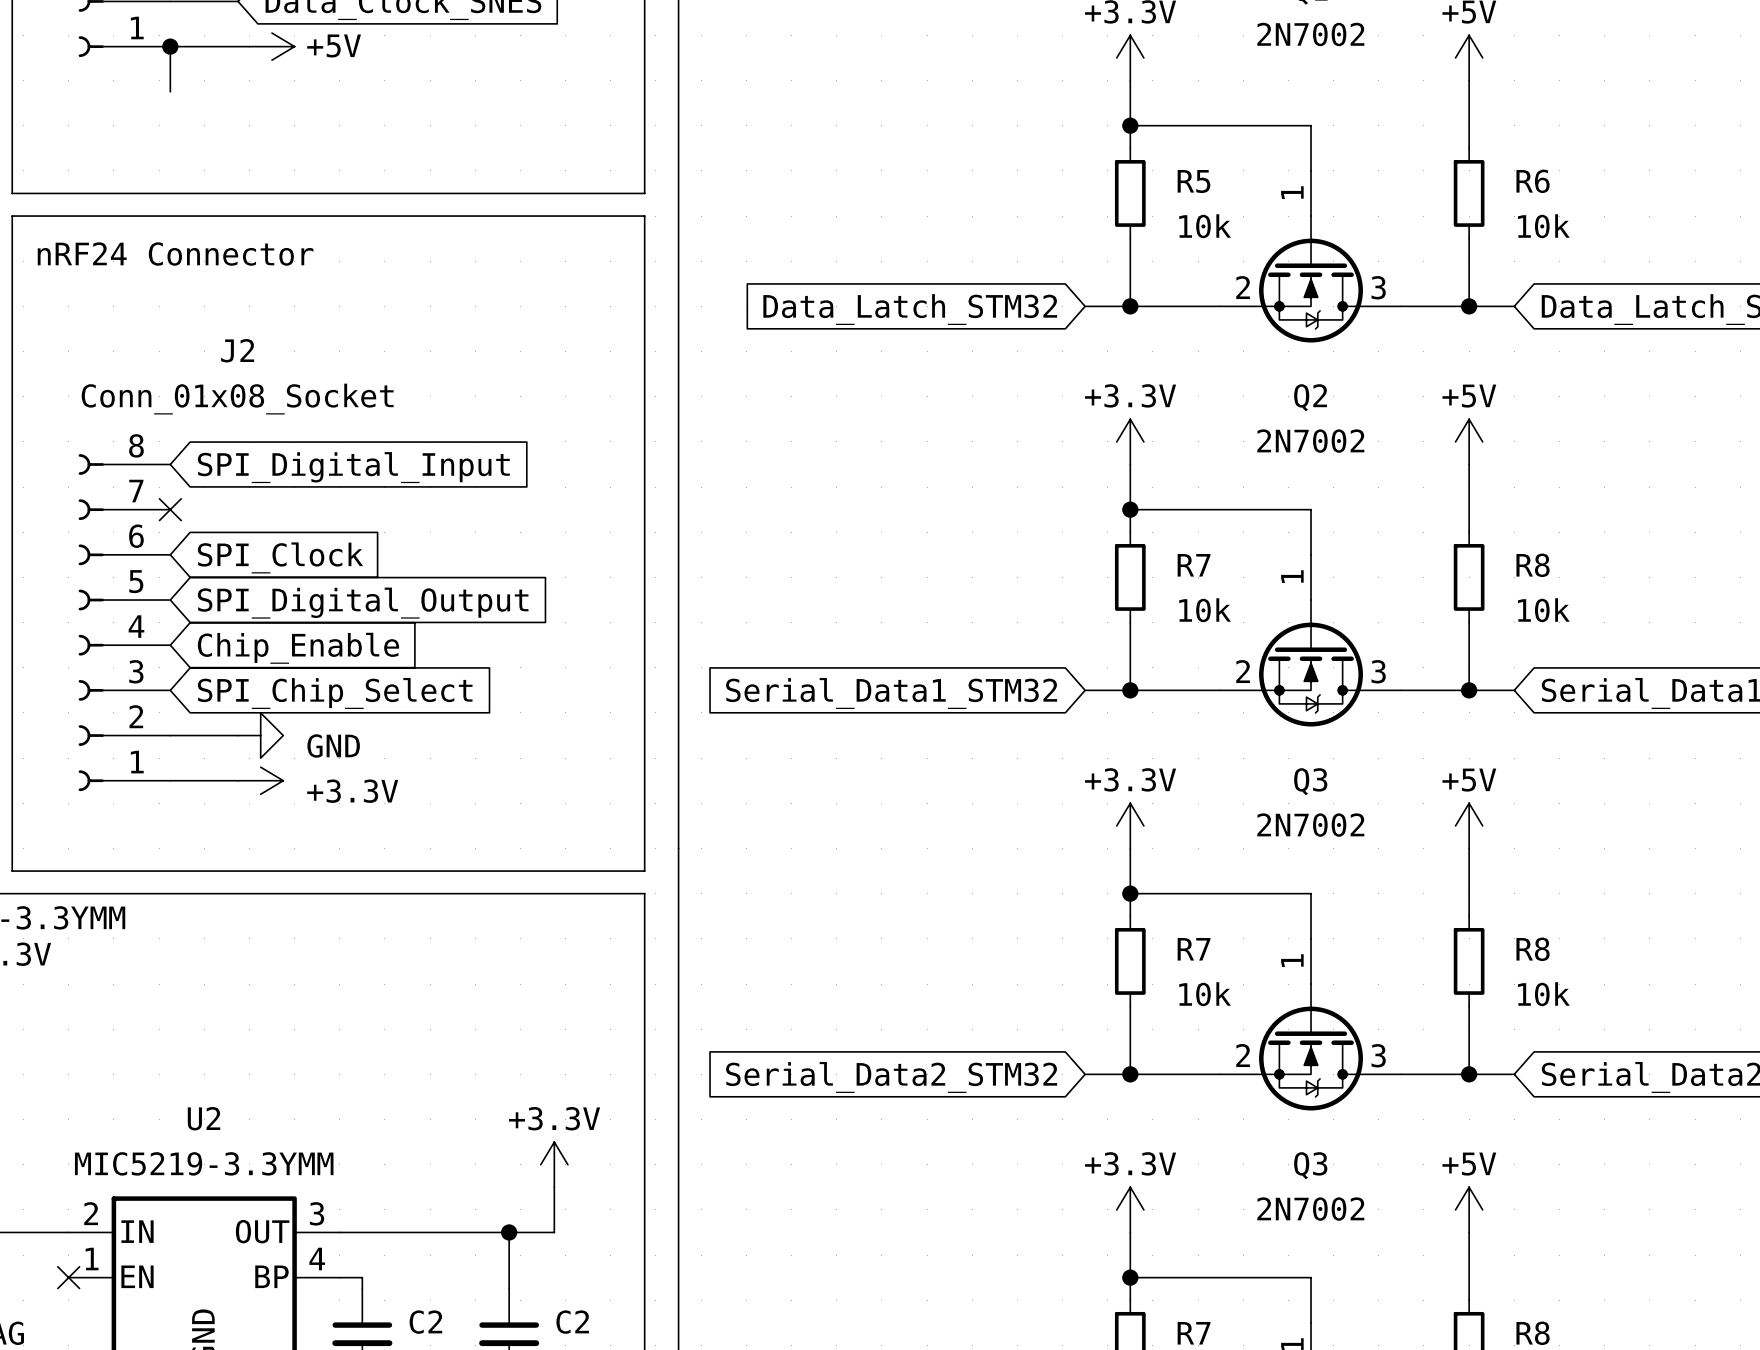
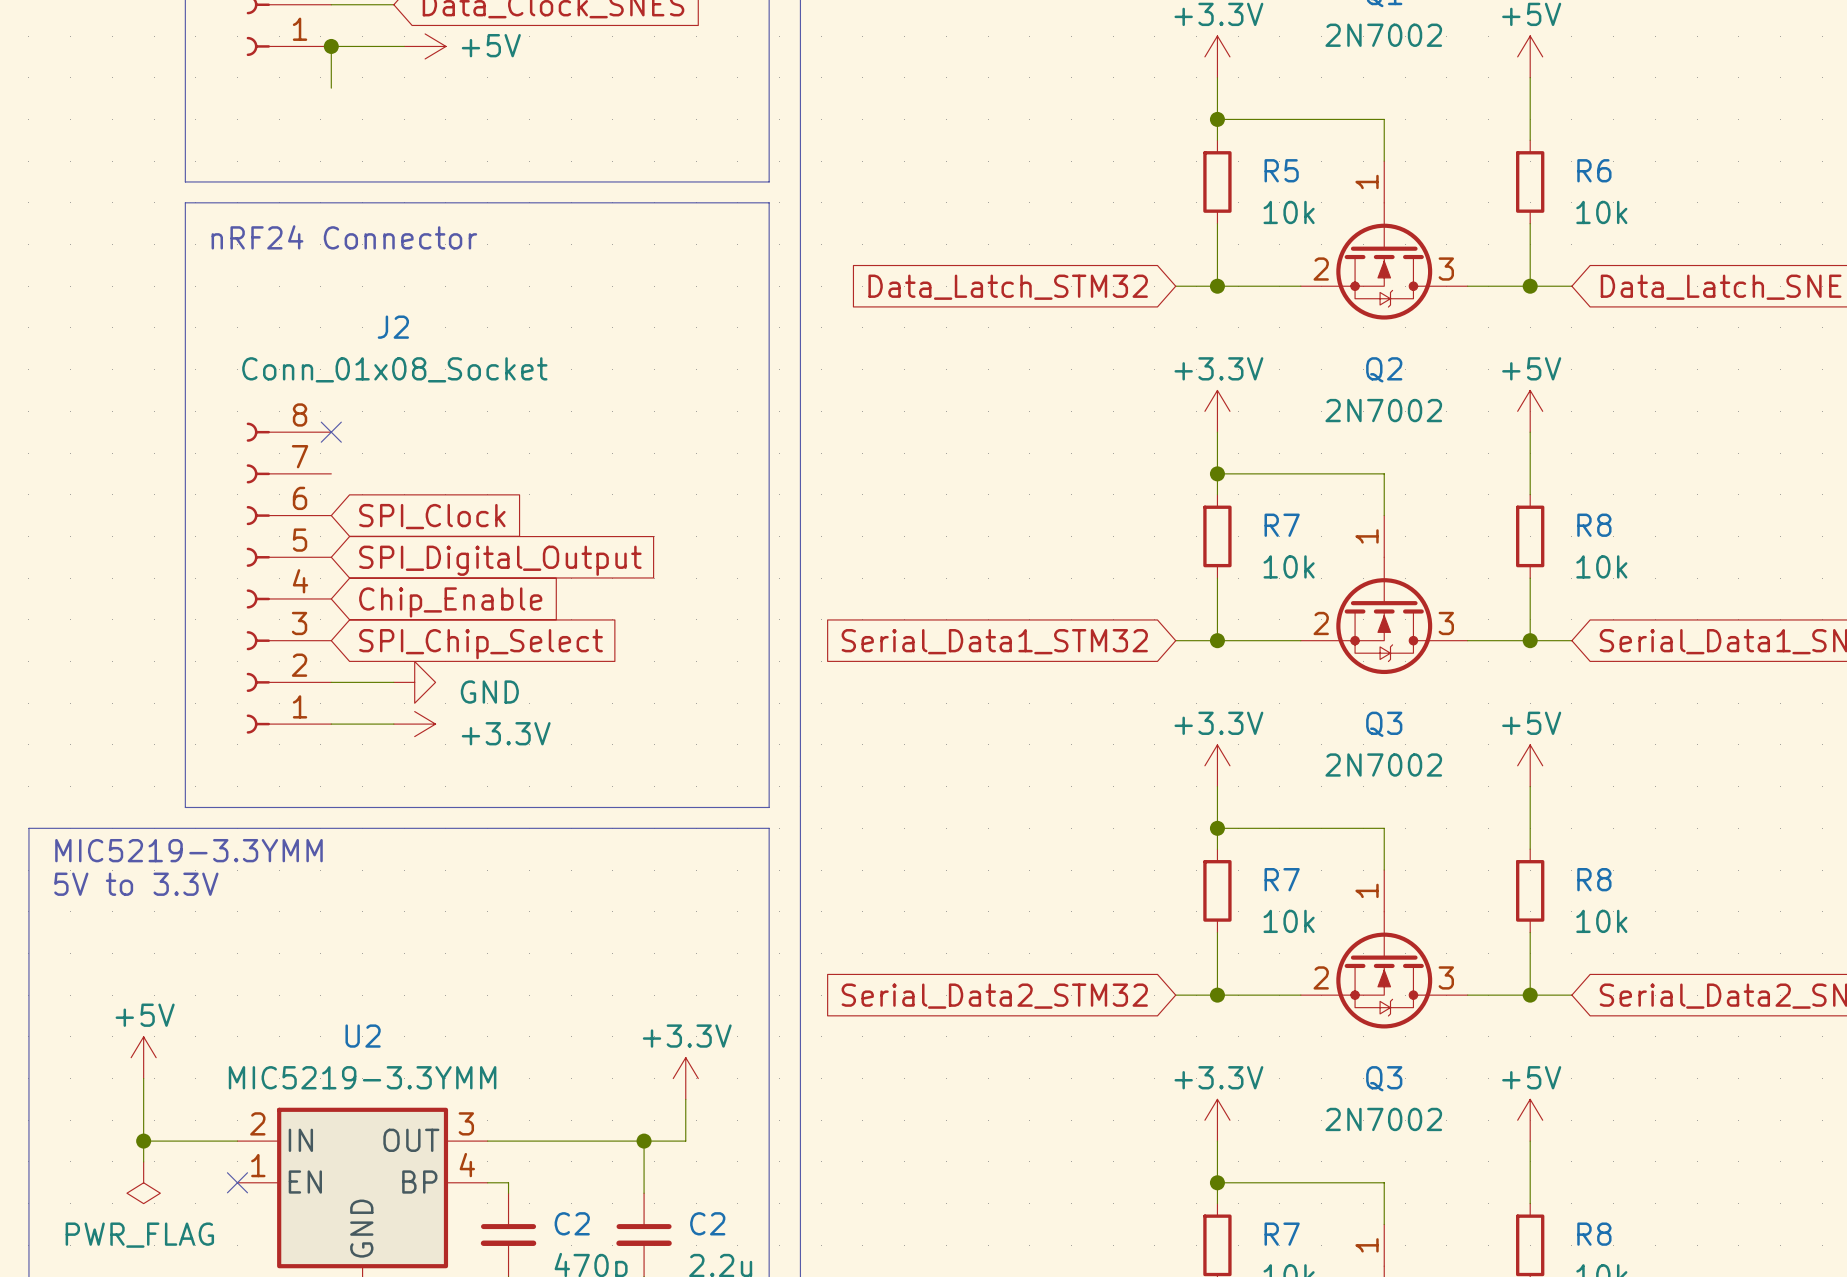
global label: SPI_Digital_Input (353, 467) -> none
no-connect mark position: (170, 509) -> (331, 432)

